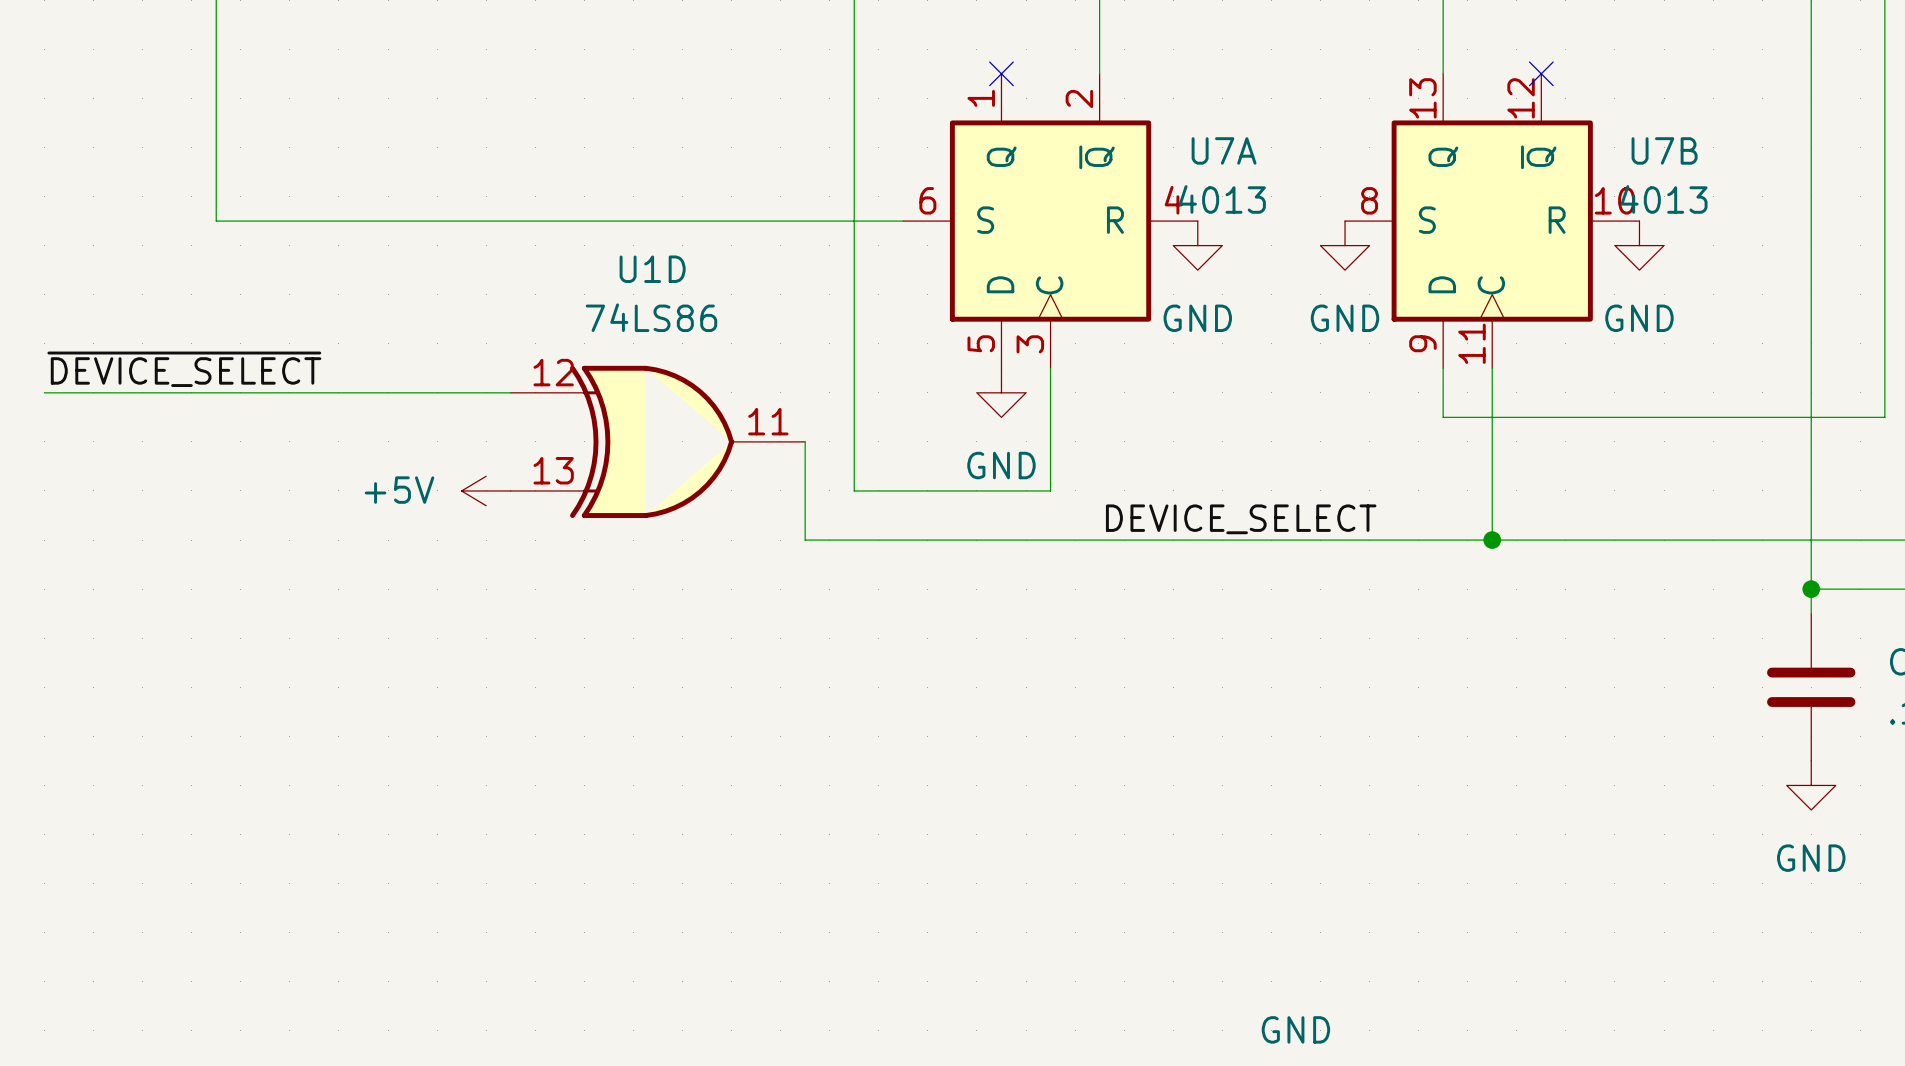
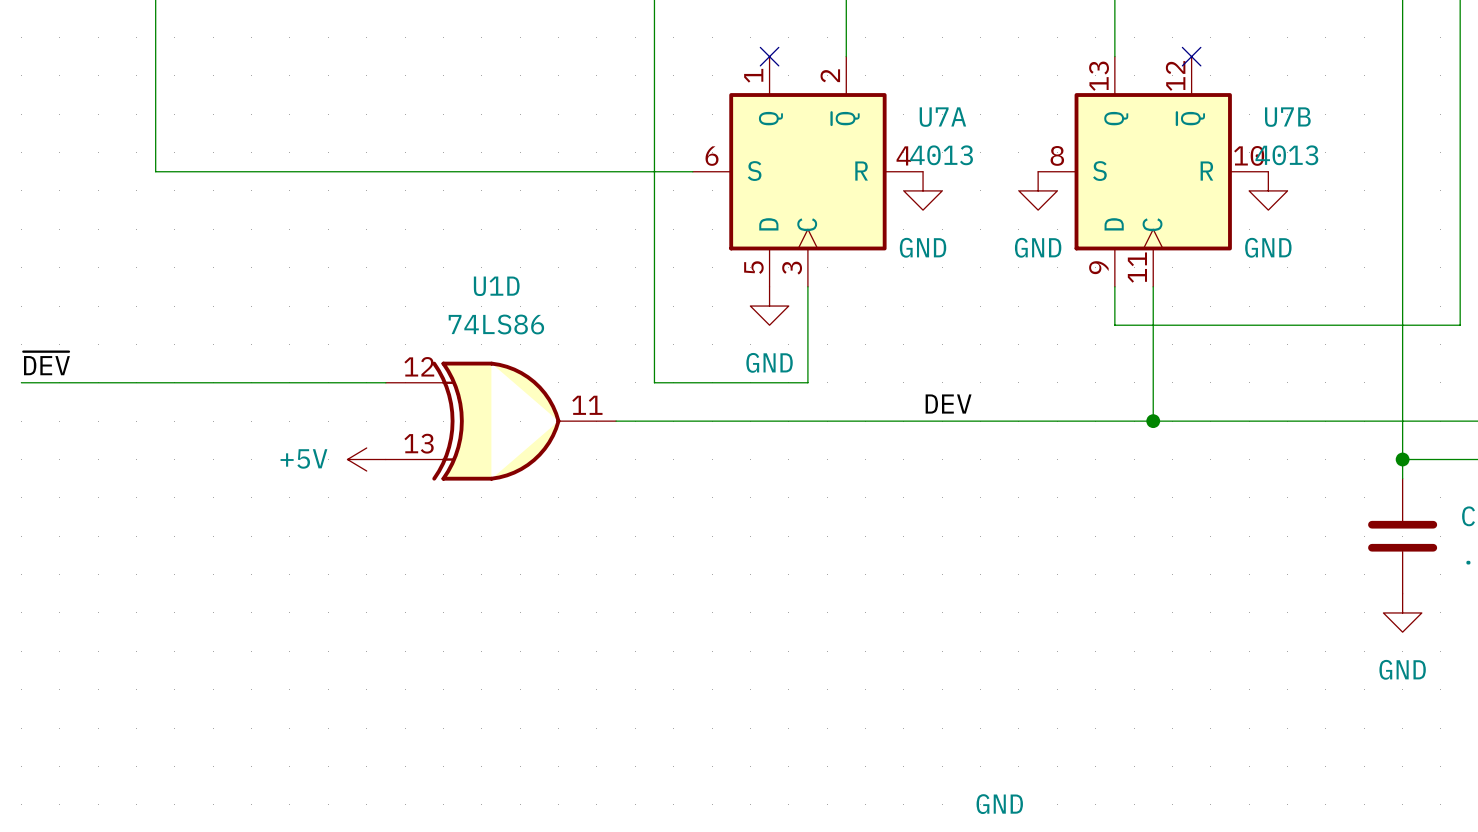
label: ~{DEVICE_SELECT} (184, 369) -> none
wire: (44, 392) (510, 392) -> (21, 382) (385, 382)
U1D position: (657, 441) -> (500, 421)
wire: (805, 441) (805, 540) -> none
label: none -> ~{DEV} (46, 363)
power symbol position: +5V (486, 490) -> +5V (366, 459)
label: none -> DEV (948, 404)
label: DEVICE_SELECT (1241, 519) -> none

